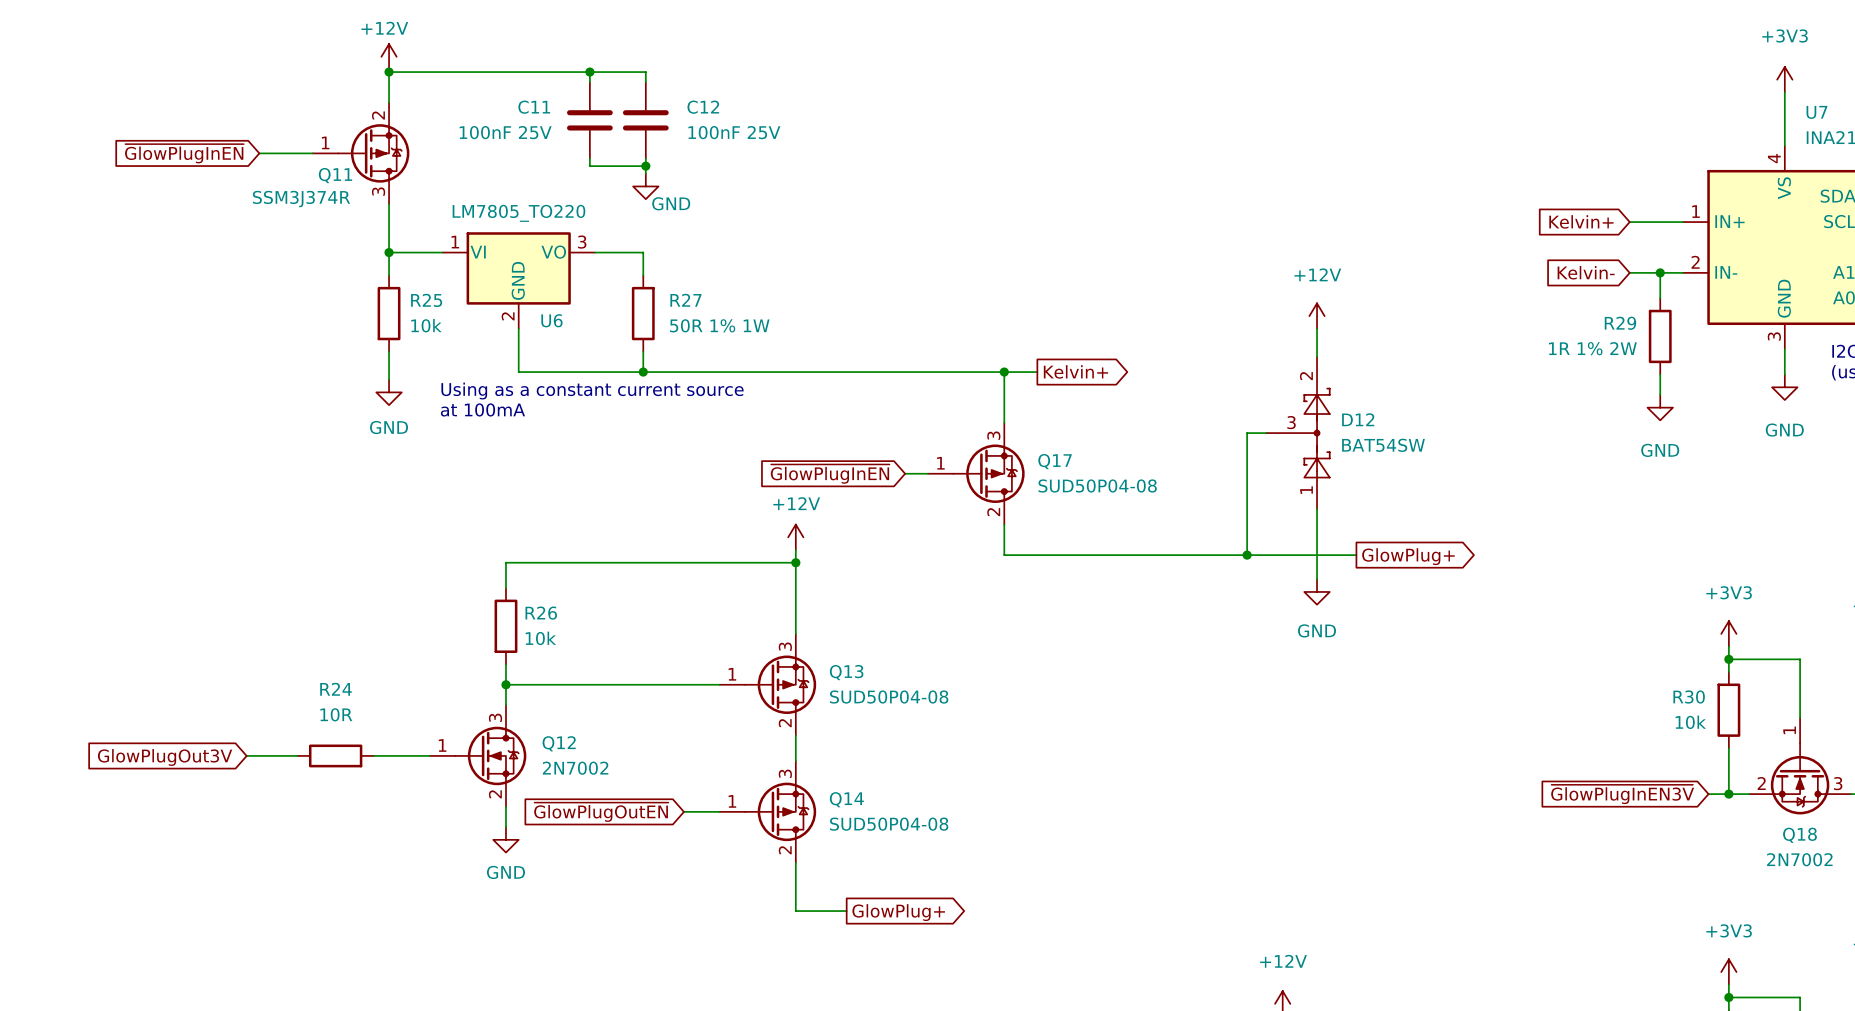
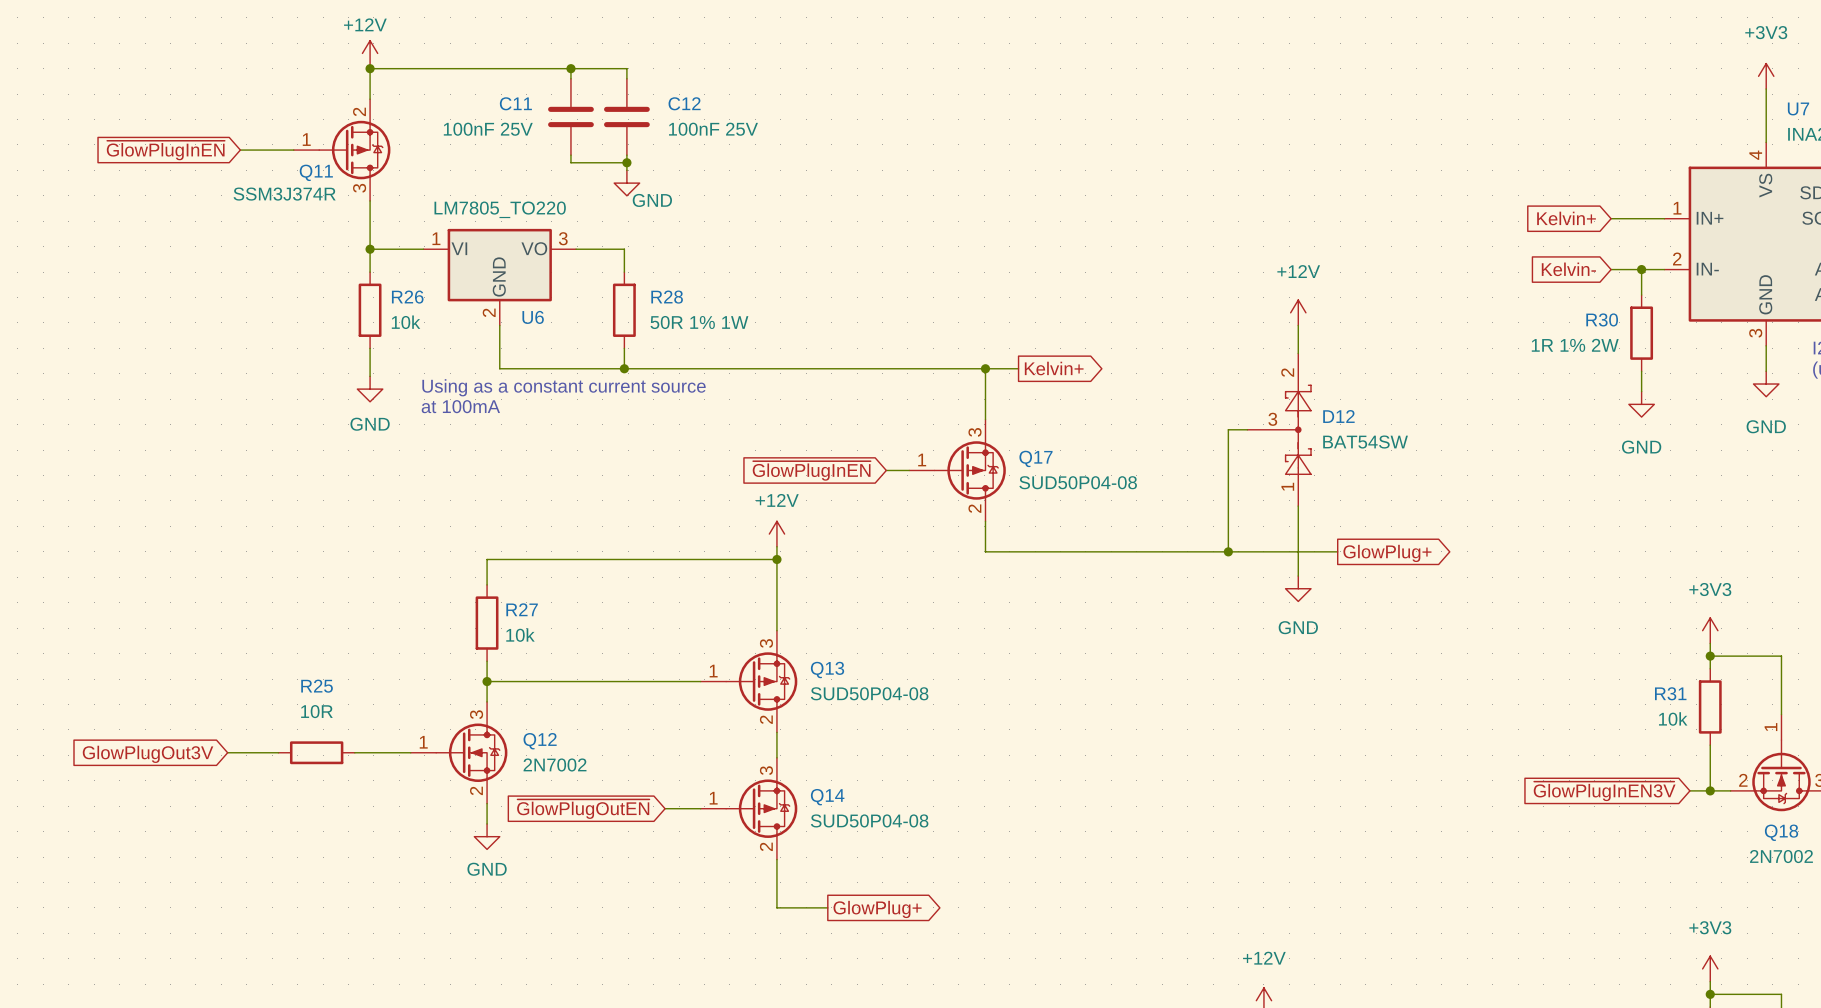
R25 name: R25 (426, 300) -> R26 (407, 297)
R27 name: R27 (685, 300) -> R28 (667, 297)
R29 name: R29 (1620, 323) -> R30 (1602, 319)
R26 name: R26 (541, 613) -> R27 (522, 609)
R24 name: R24 (336, 689) -> R25 (317, 686)
R30 name: R30 (1689, 697) -> R31 (1670, 693)

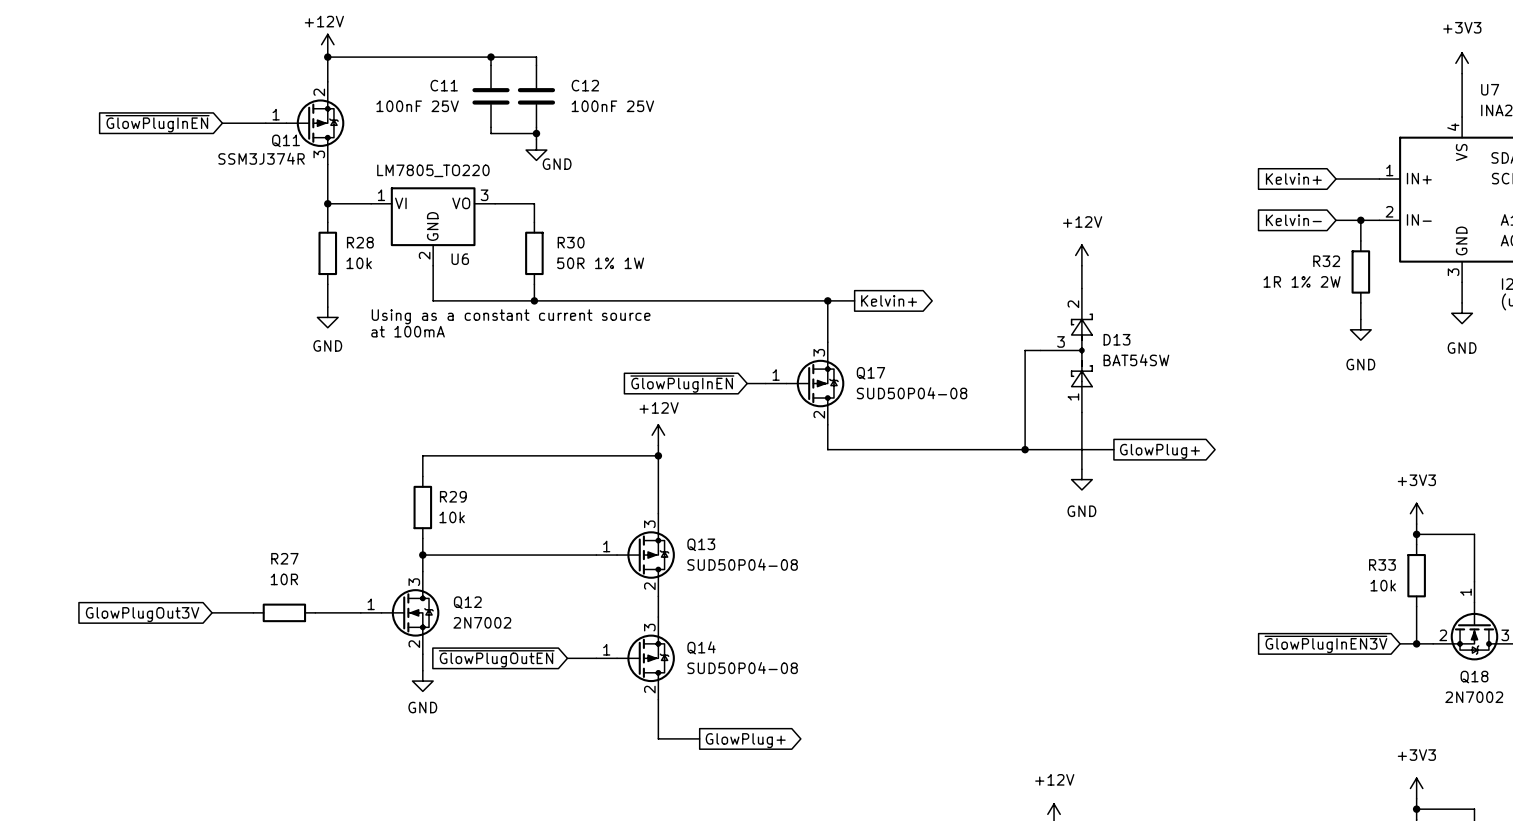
R26 name: R26 (407, 297) -> R28 (360, 242)
R28 name: R28 (667, 297) -> R30 (571, 242)
R30 name: R30 (1602, 319) -> R32 (1326, 261)
D12 name: D12 (1338, 416) -> D13 (1116, 339)
R27 name: R27 (522, 609) -> R29 (453, 496)
R25 name: R25 (317, 686) -> R27 (284, 558)
R31 name: R31 (1670, 693) -> R33 (1382, 564)

